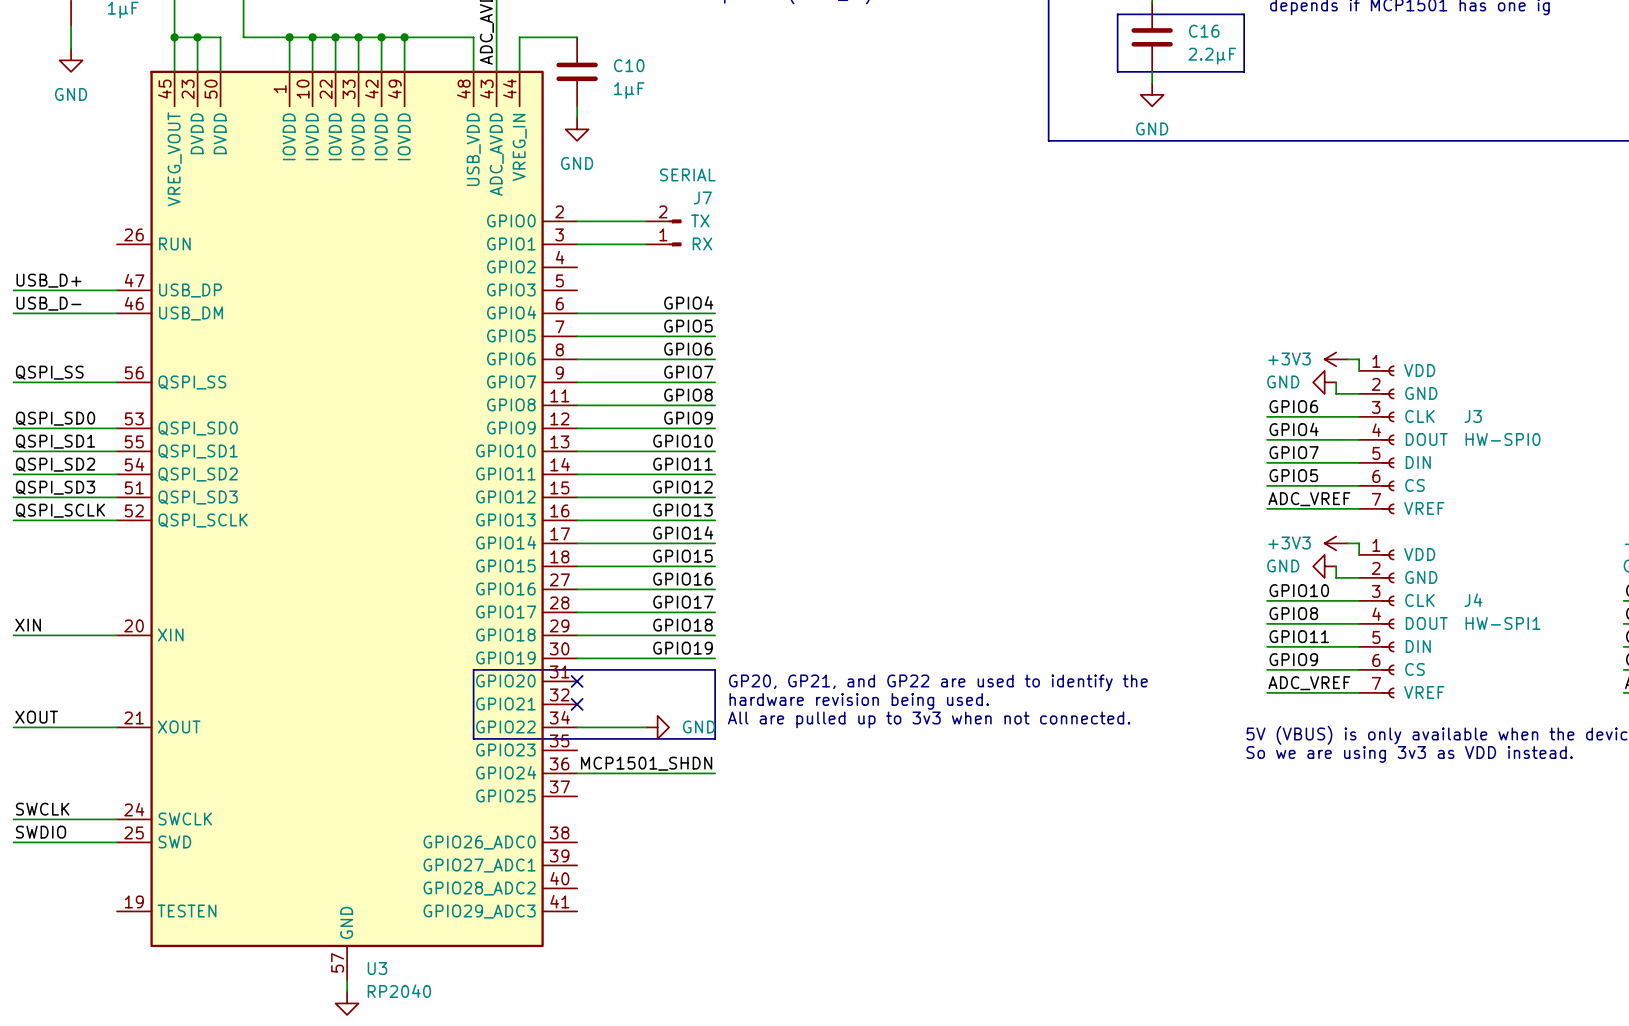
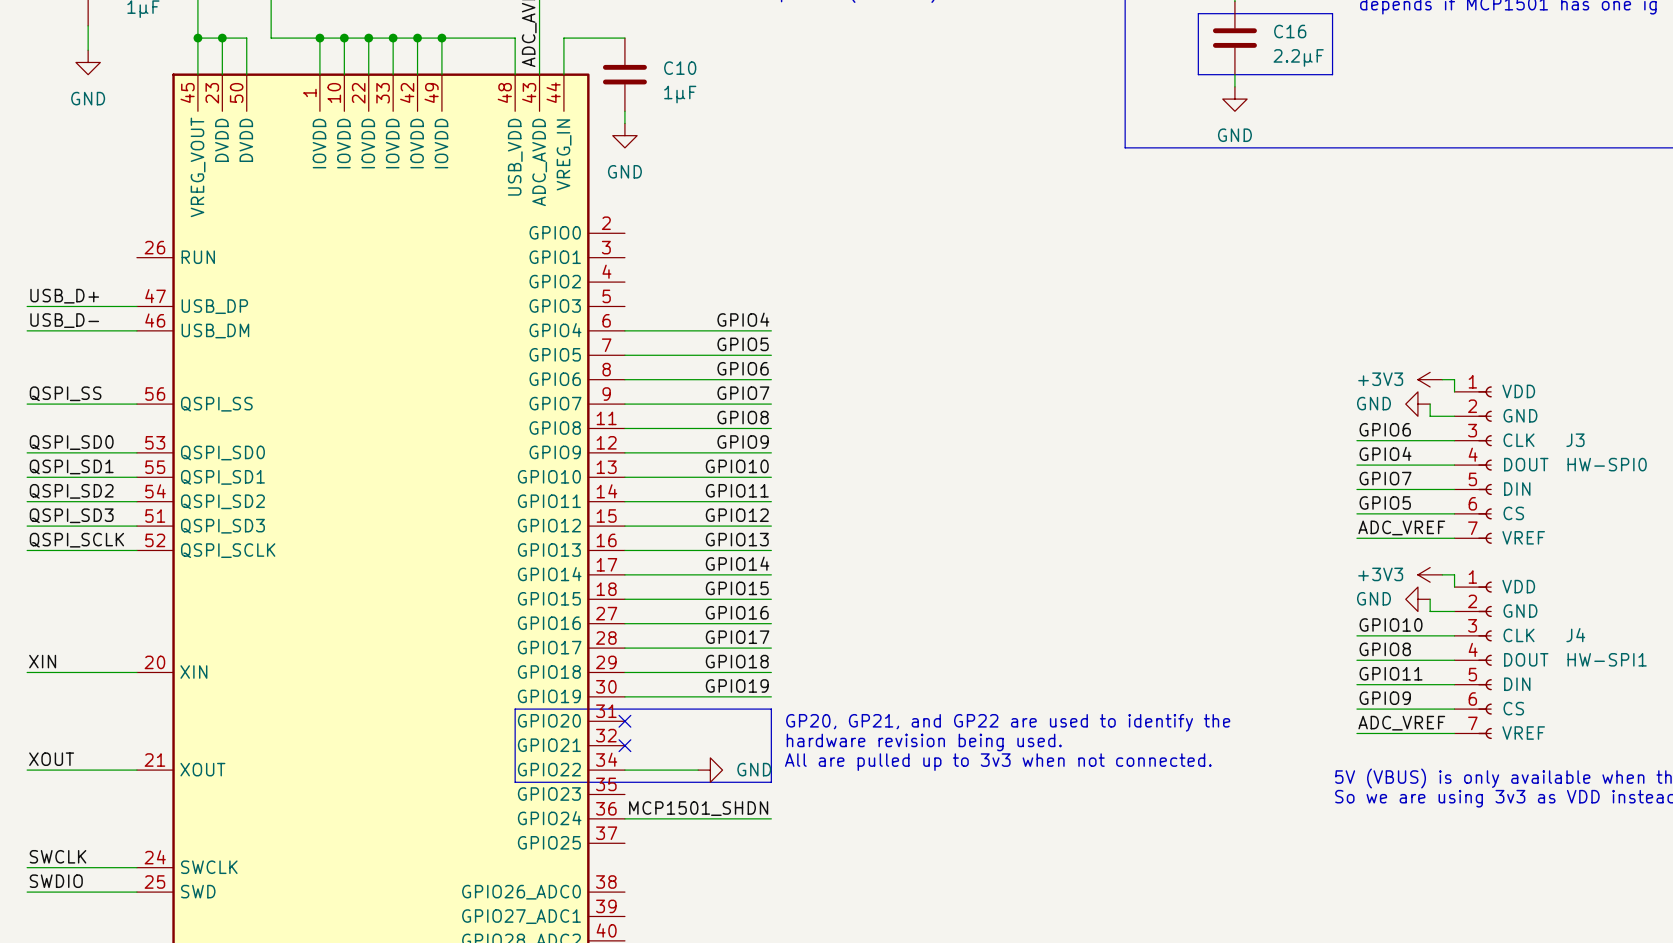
wire: (577, 221) (646, 221) -> none
J7: SERIAL (663, 232) -> none
wire: (577, 244) (646, 244) -> none

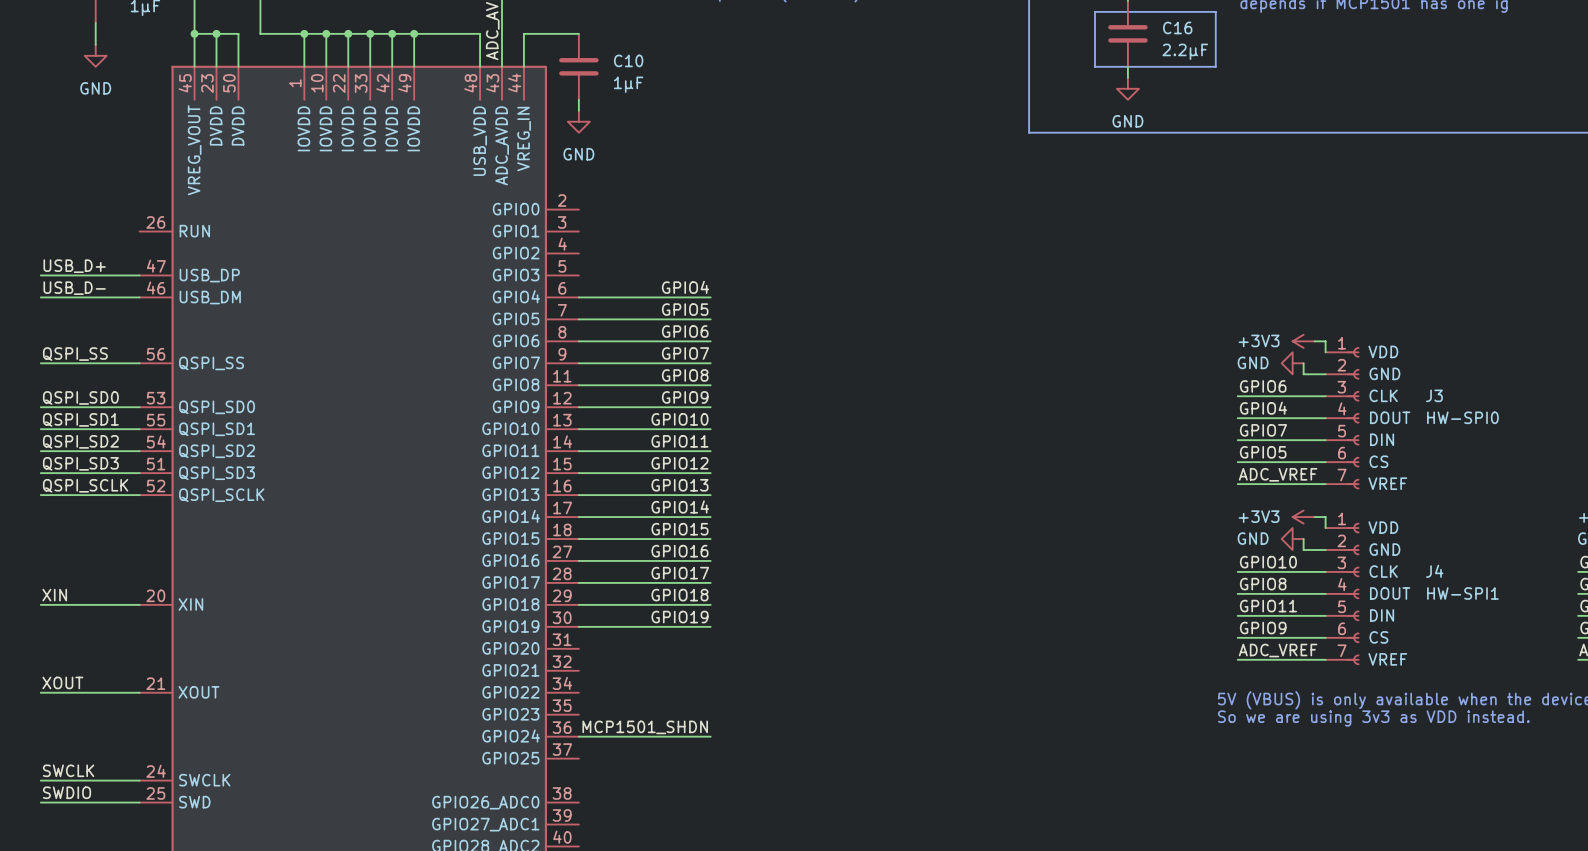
line: (515, 709) (771, 709) (771, 782) (515, 782) (515, 709) -> none
no-connect mark: (624, 721) -> none
text: GP20, GP21, and GP22 are used to identify the (1008, 722) -> none
text: hardware revision being used. (924, 742) -> none
no-connect mark: (624, 745) -> none
text: All are pulled up to 3v3 when not connected. (998, 762) -> none
wire: (624, 770) (698, 770) -> none
power symbol: GND (710, 770) -> none

